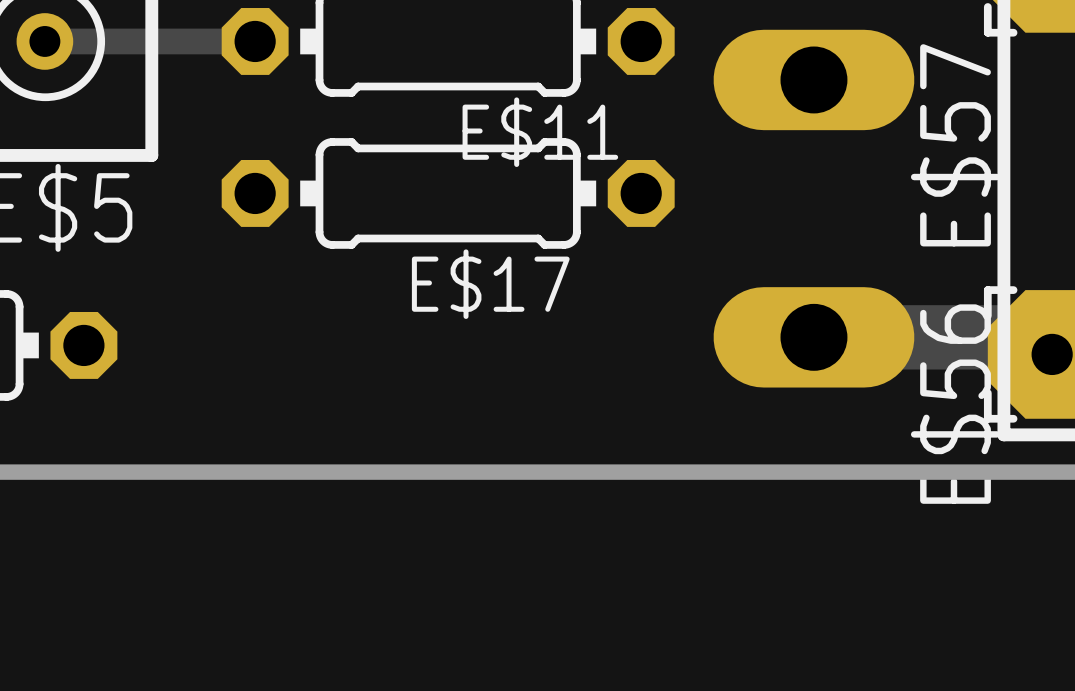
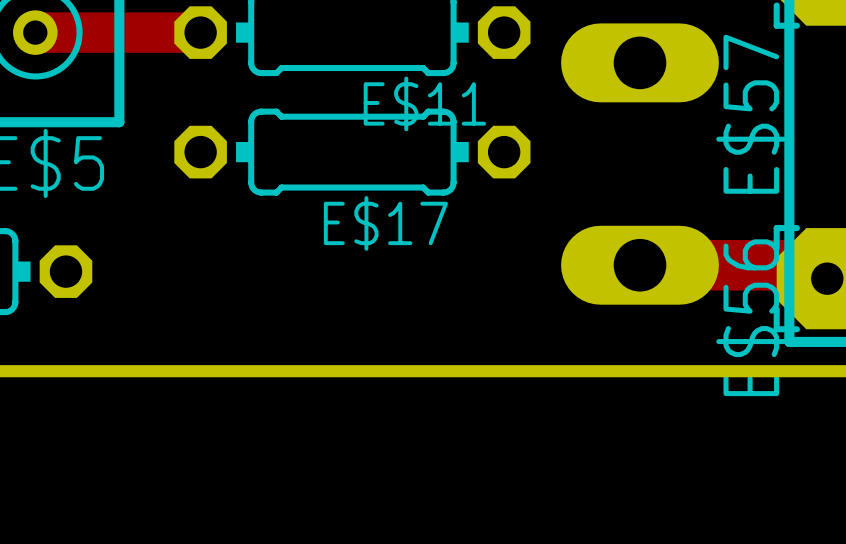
track width: thin (44, 41) (255, 41) -> thick (35, 32) (200, 32)

